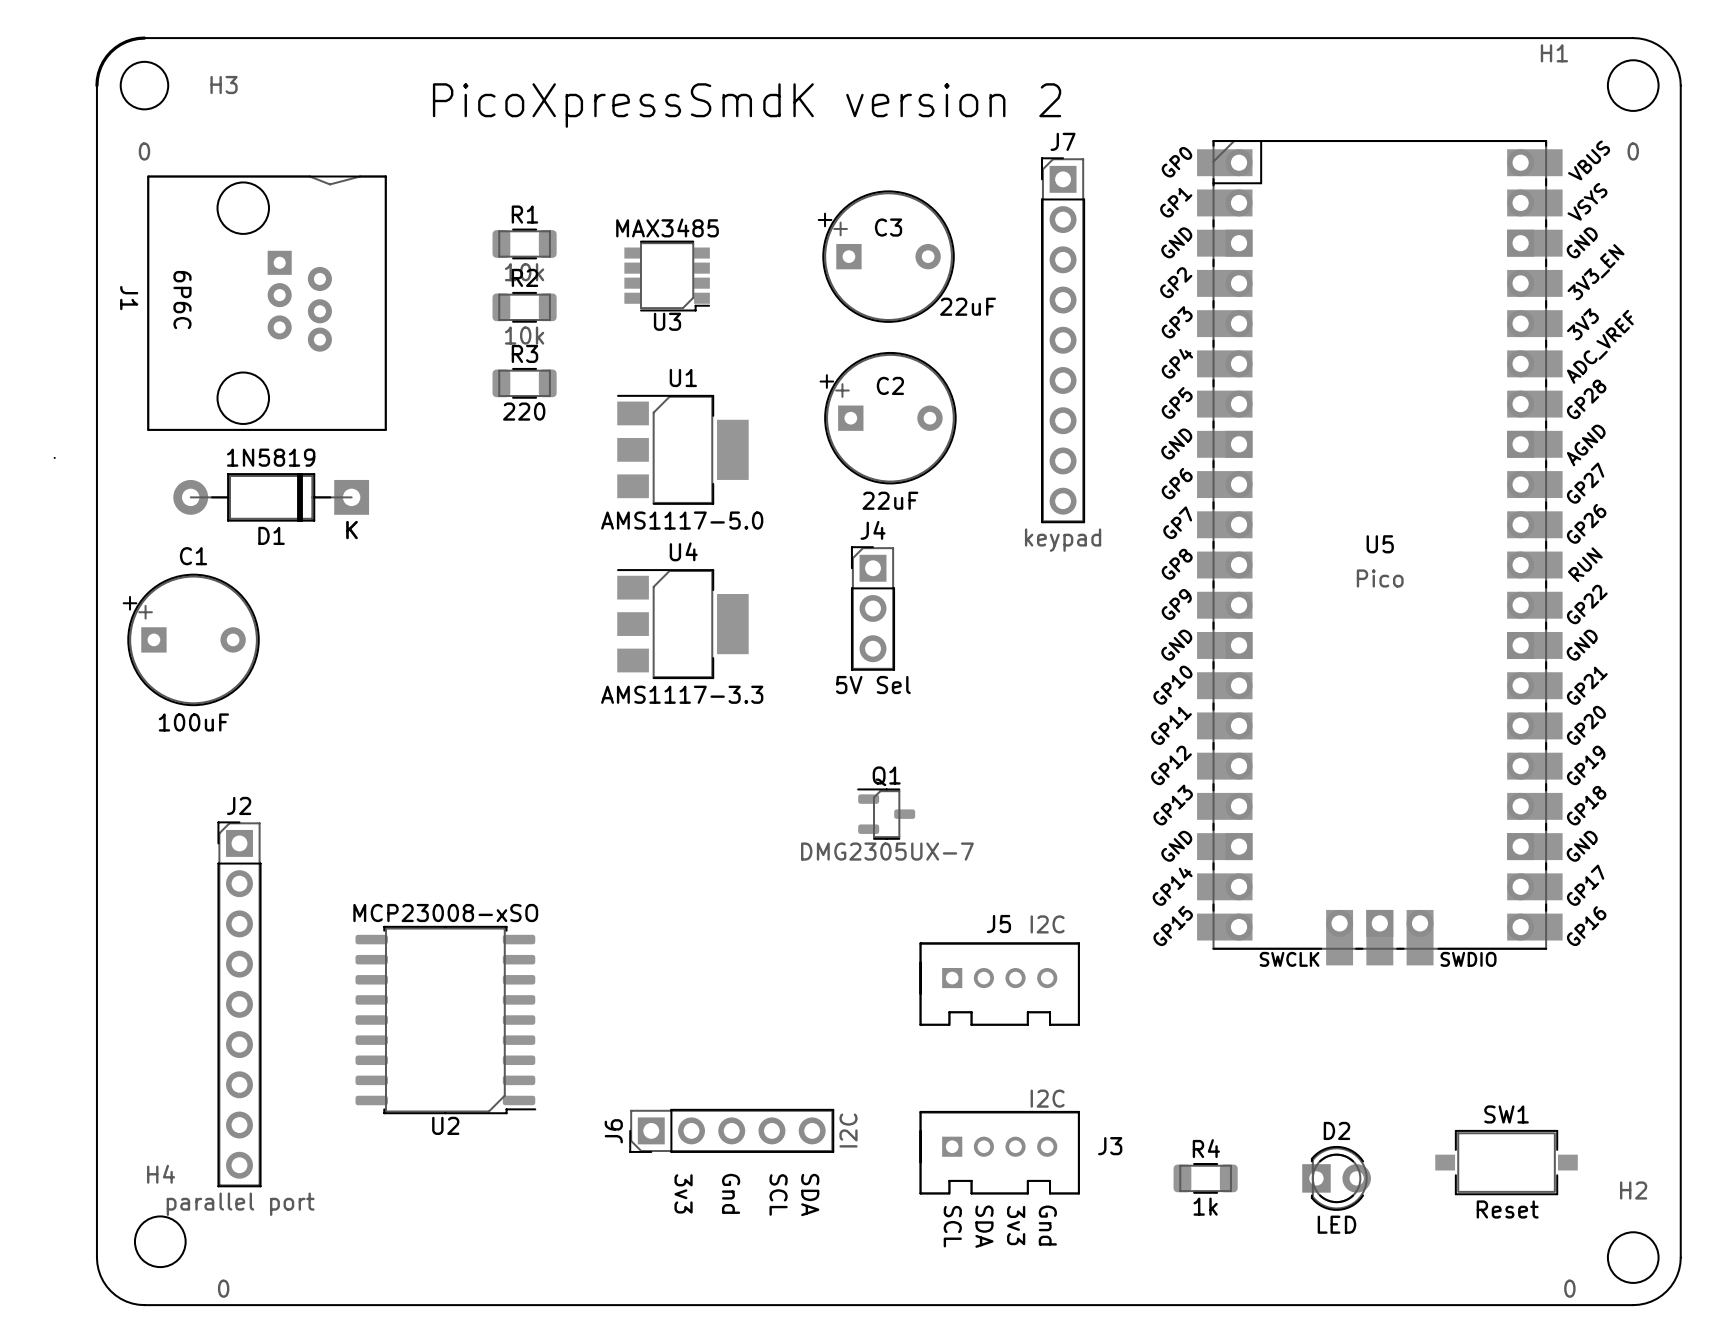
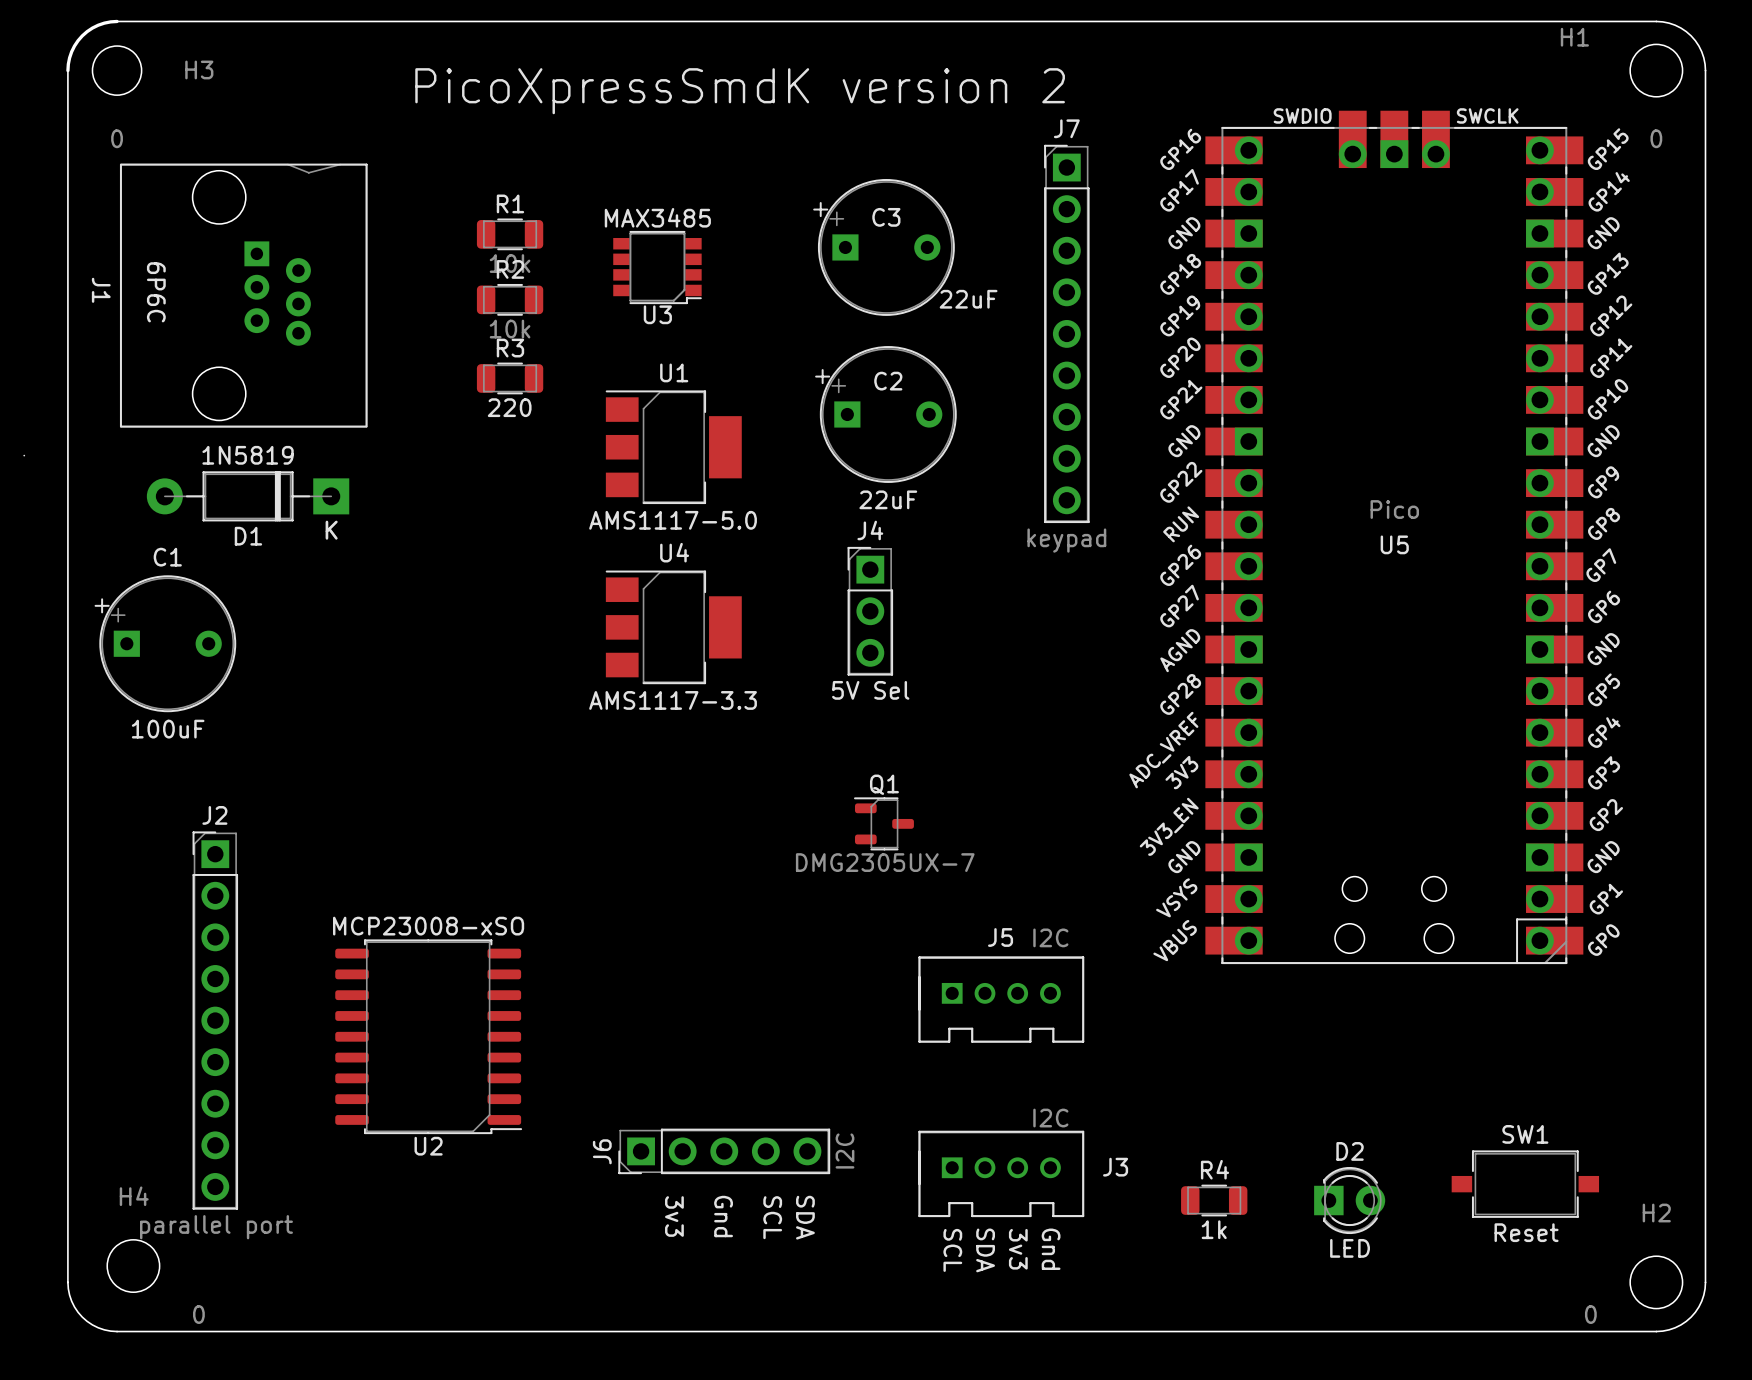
U5 footprint: [1197, 140, 1563, 966] -> [1205, 110, 1584, 965]
U5 value position: Pico (1380, 578) -> Pico (1394, 509)

